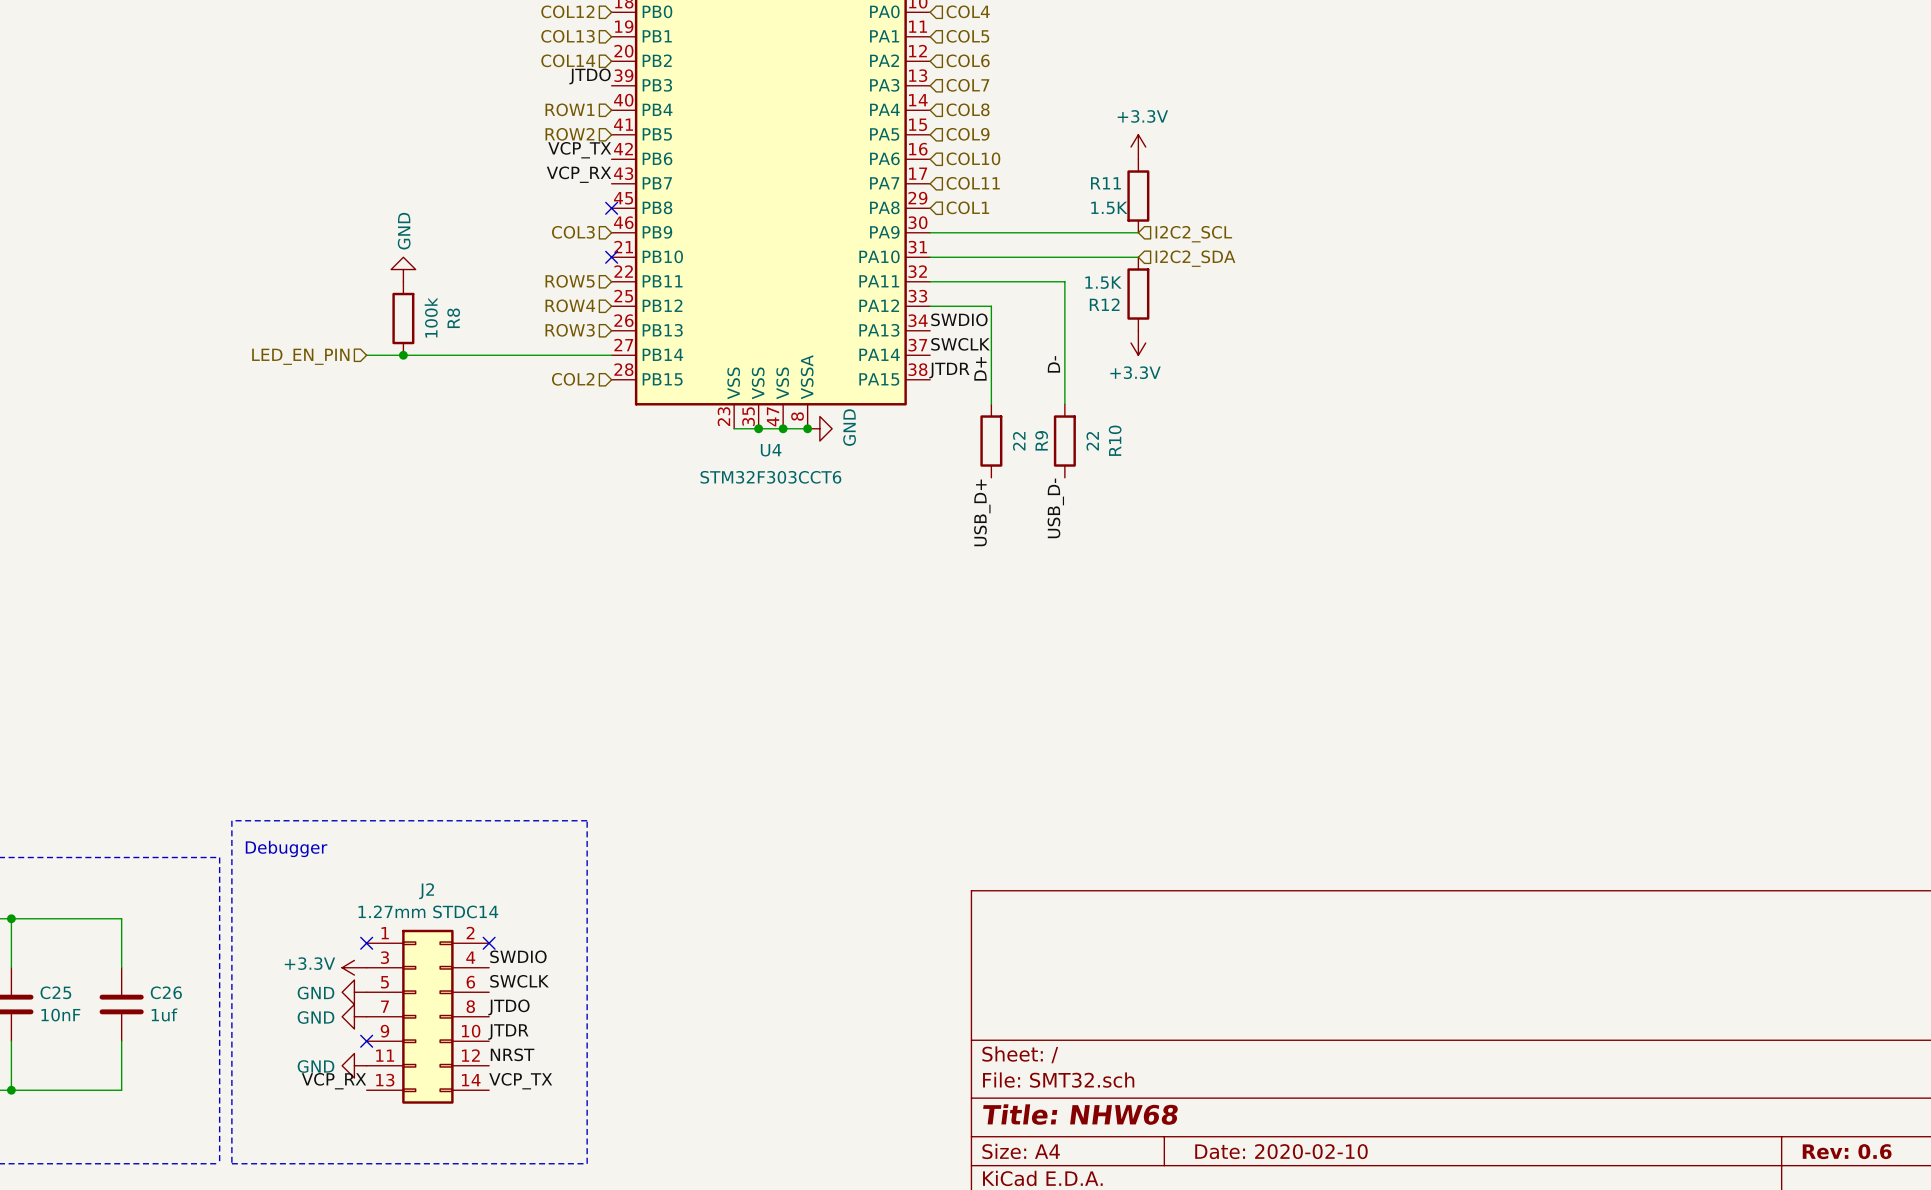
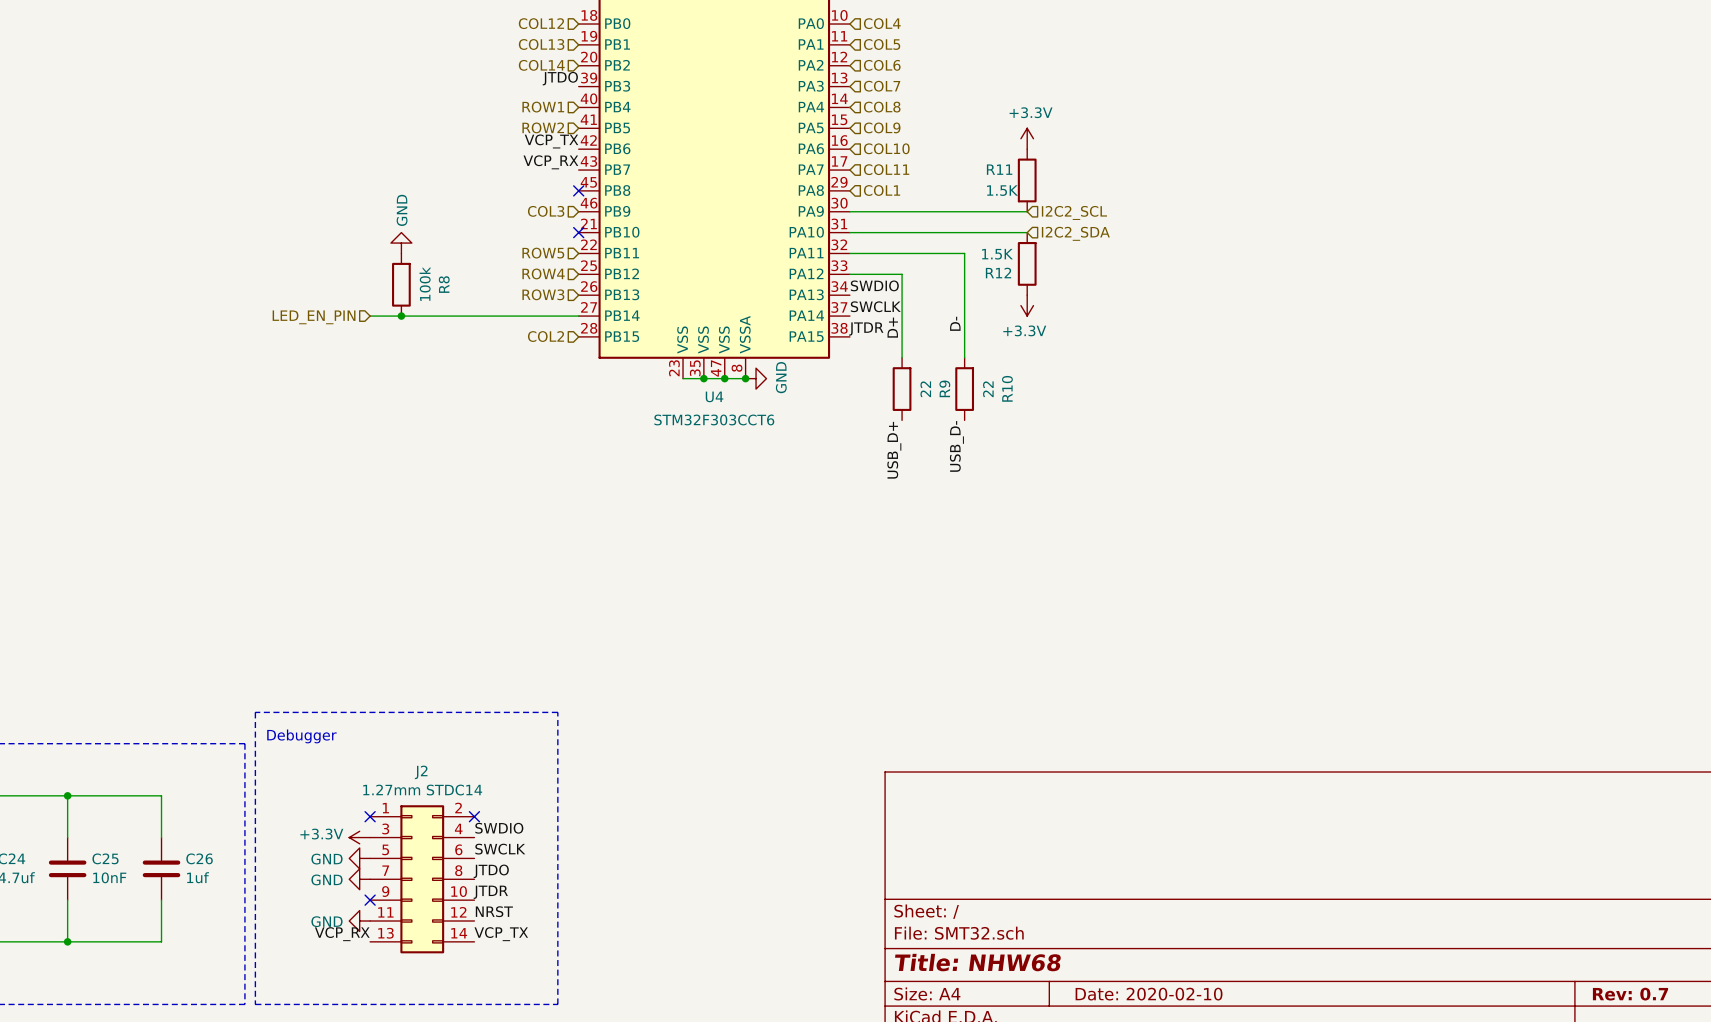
title block: Rev: 0.6 (1847, 1151) -> Rev: 0.7 (1630, 994)

